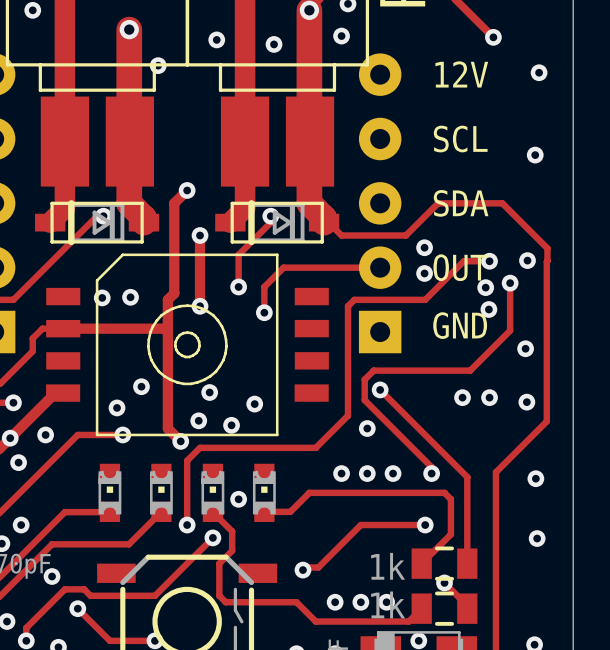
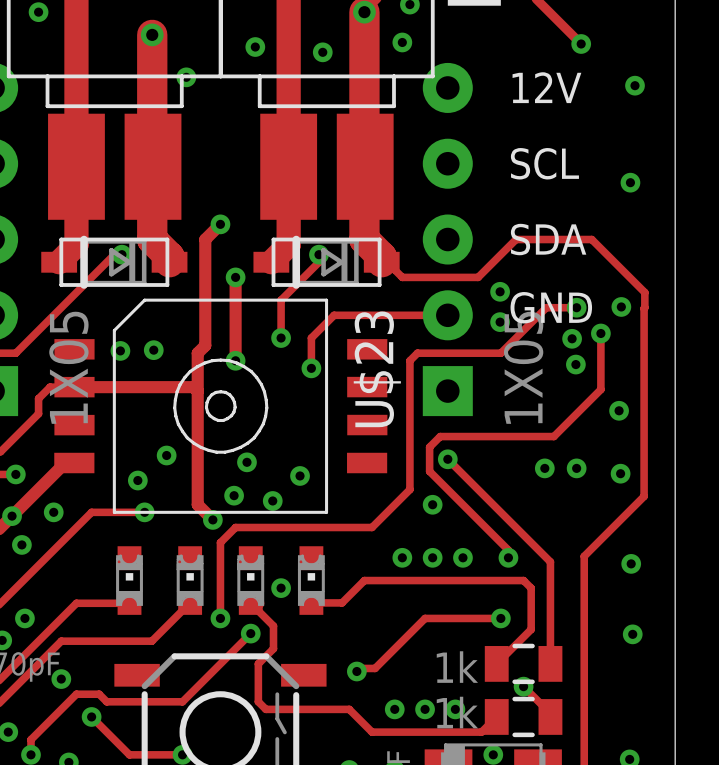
text: OUT (460, 267) -> none
part value: none -> 1X05 (68, 367)
U$23 value: none -> 1X05 (523, 367)
U$23 name: none -> U$23 (377, 369)
text position: GND (460, 325) -> GND (551, 307)

